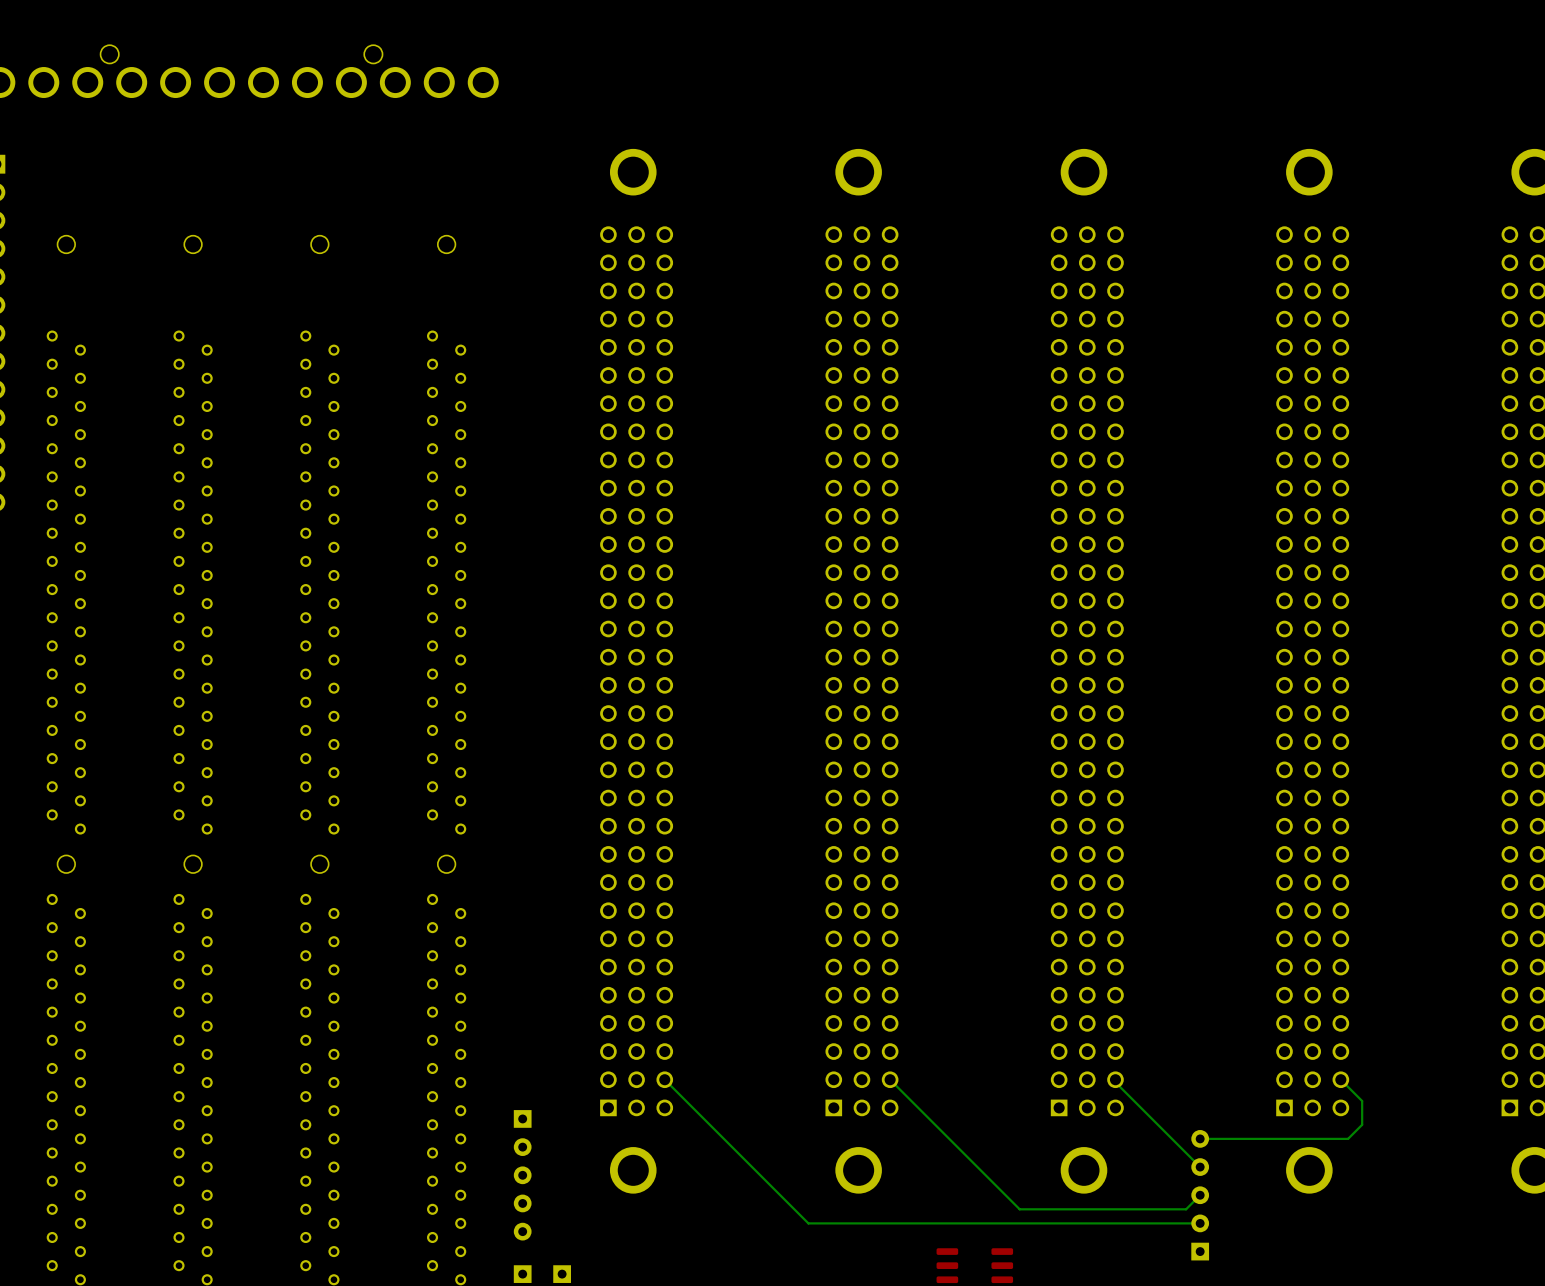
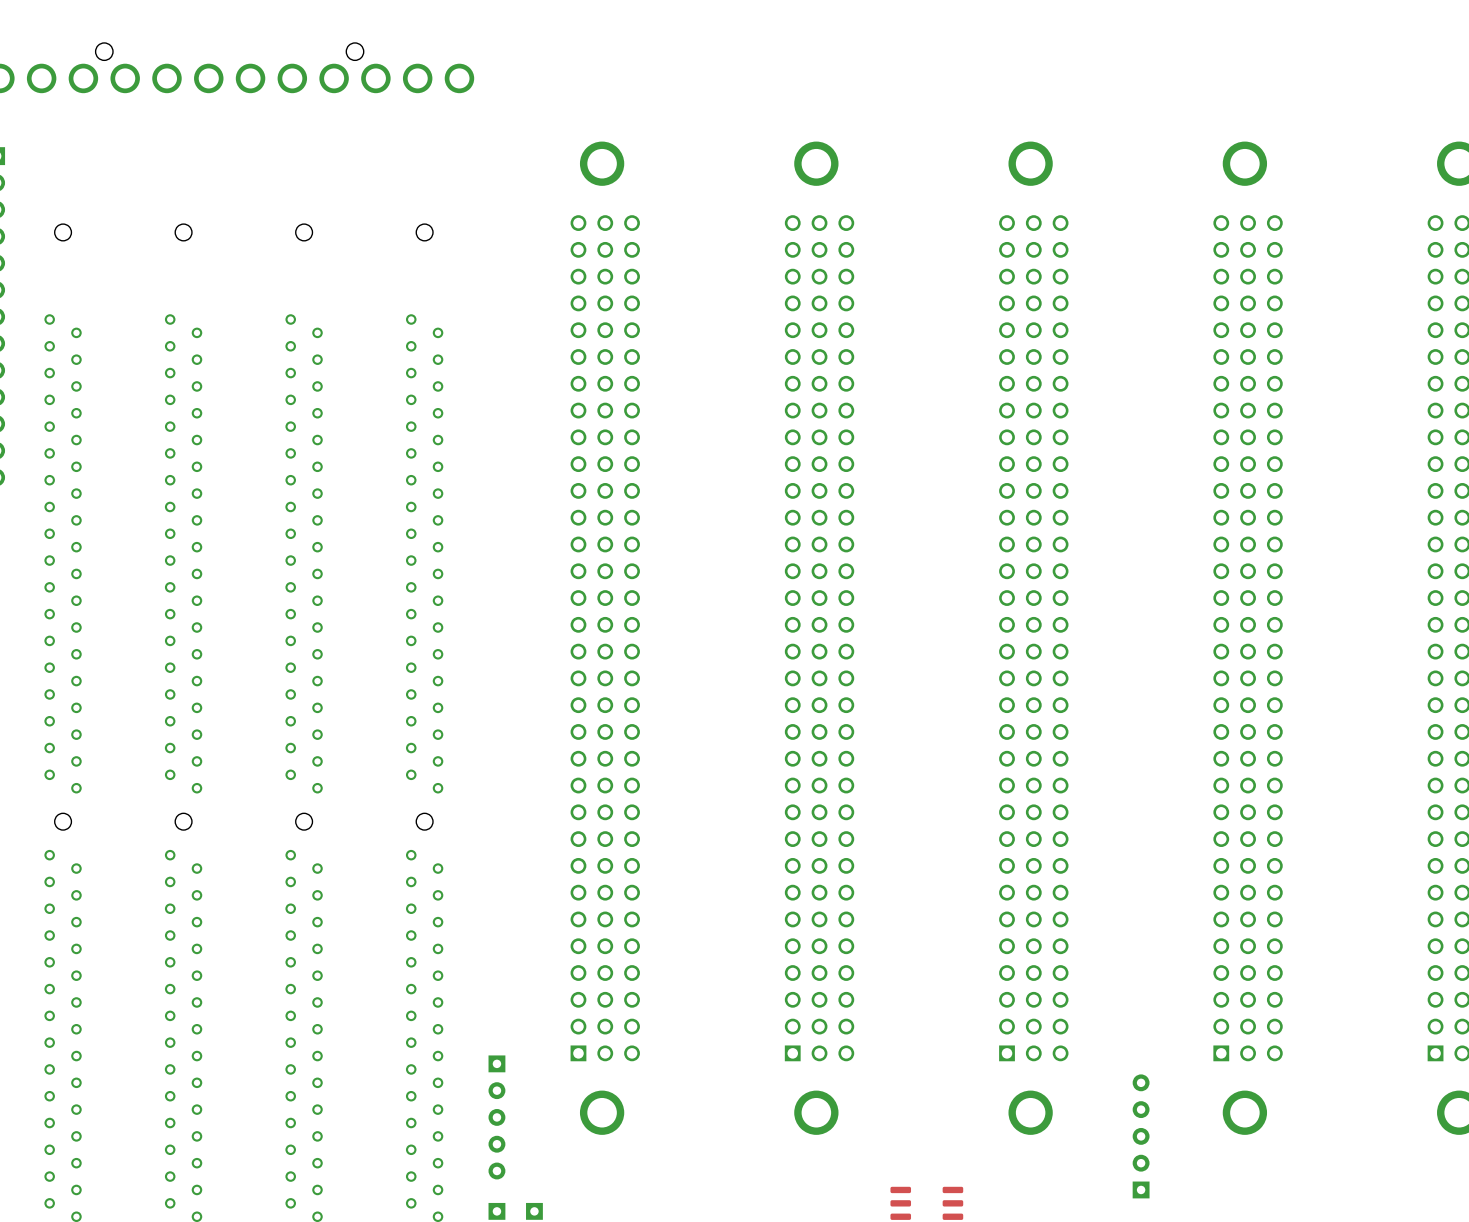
bottom track: (664, 1079) (808, 1223) (1200, 1223) -> none
bottom track: (890, 1079) (1019, 1209) (1186, 1209) (1200, 1195) -> none
bottom track: (1115, 1079) (1115, 1082) (1200, 1167) -> none
bottom track: (1340, 1079) (1362, 1101) (1362, 1124) (1348, 1138) (1200, 1138) -> none

